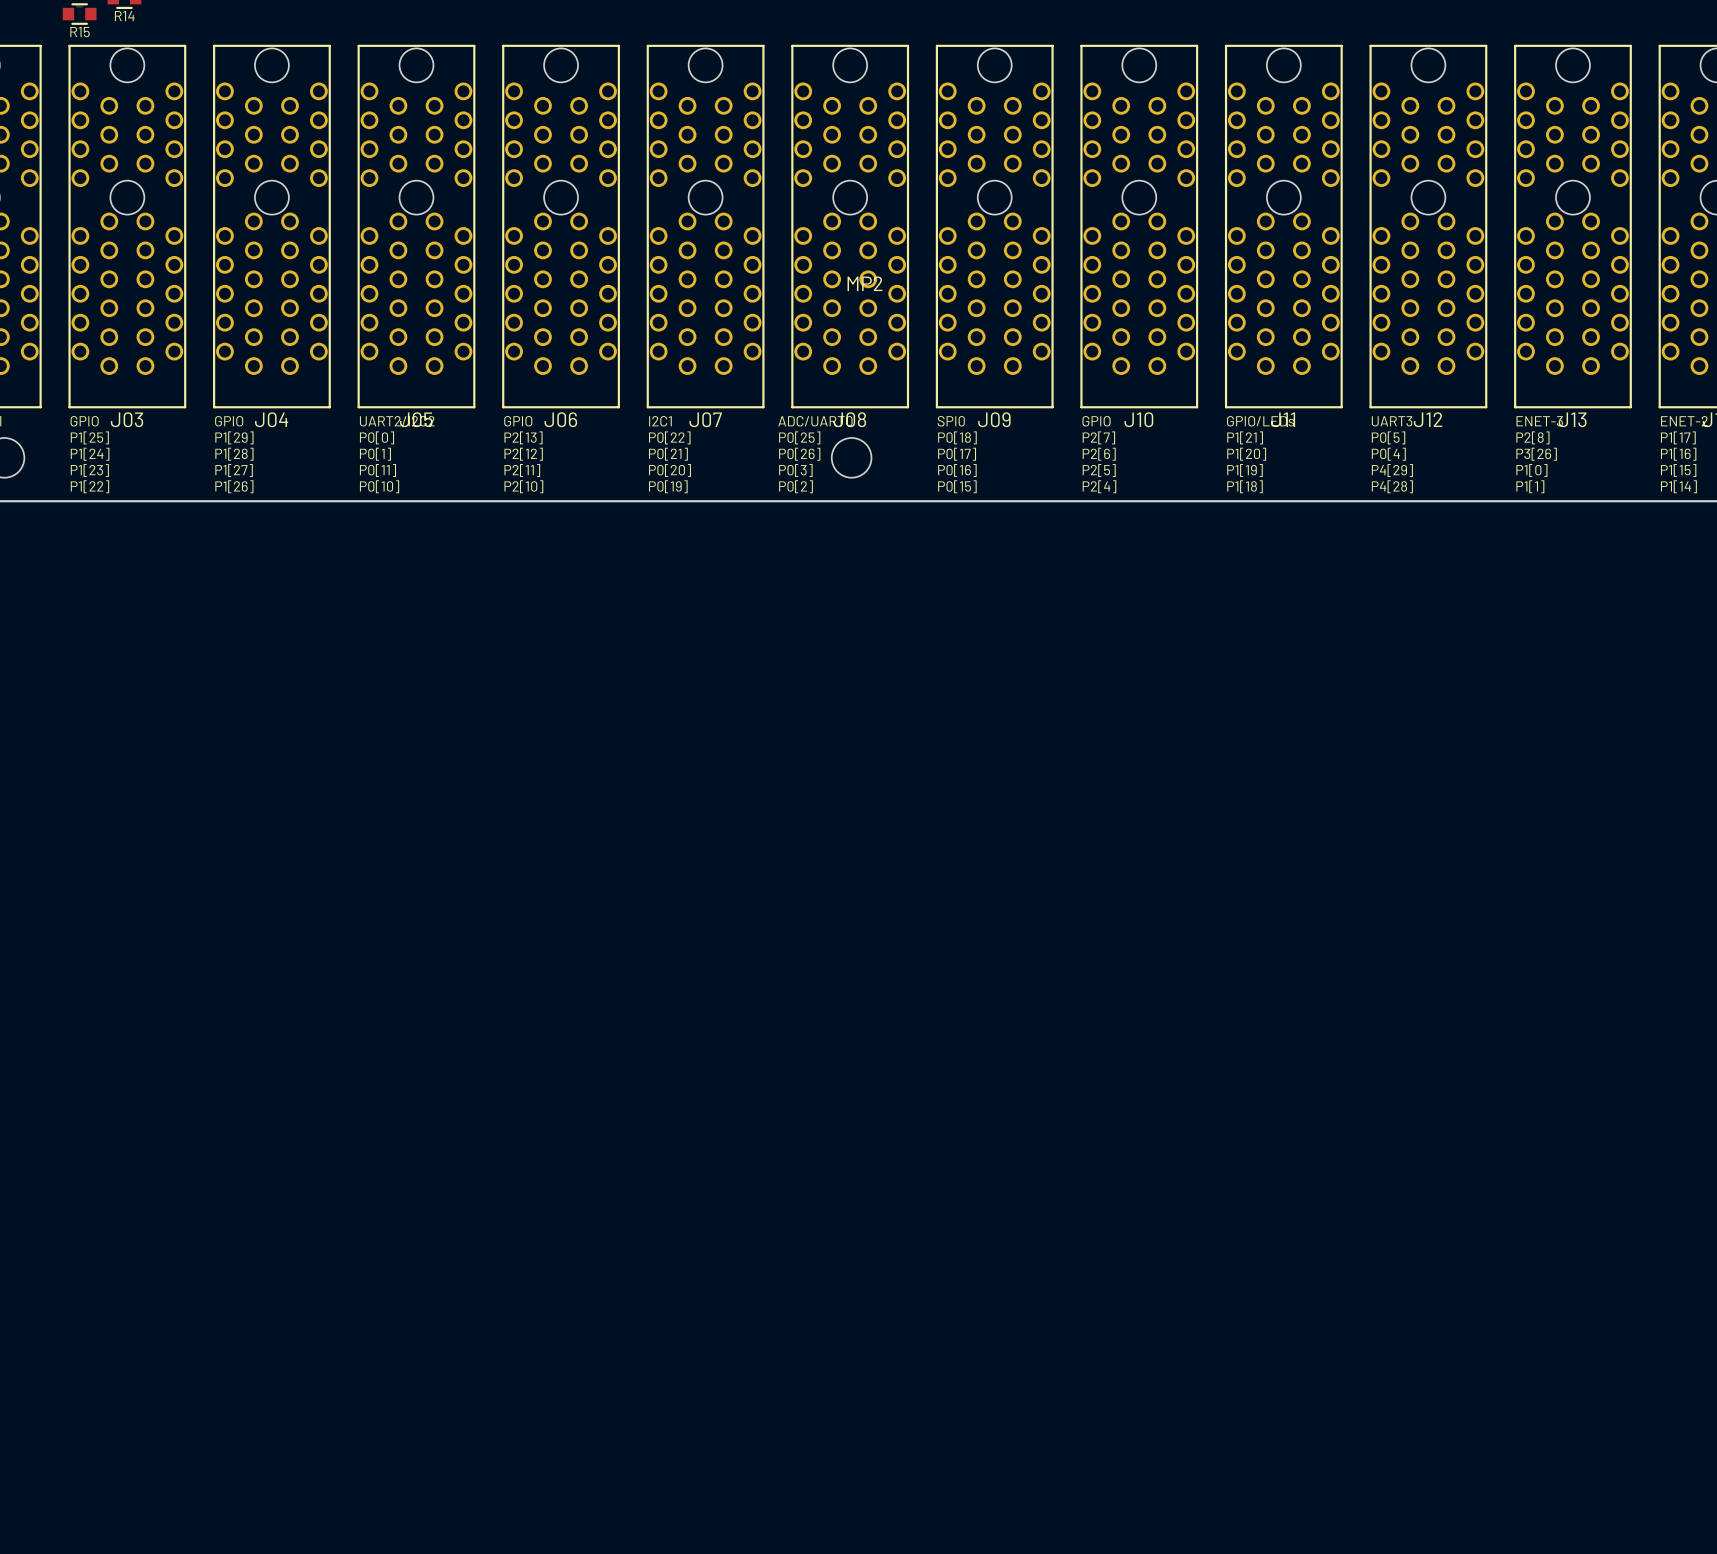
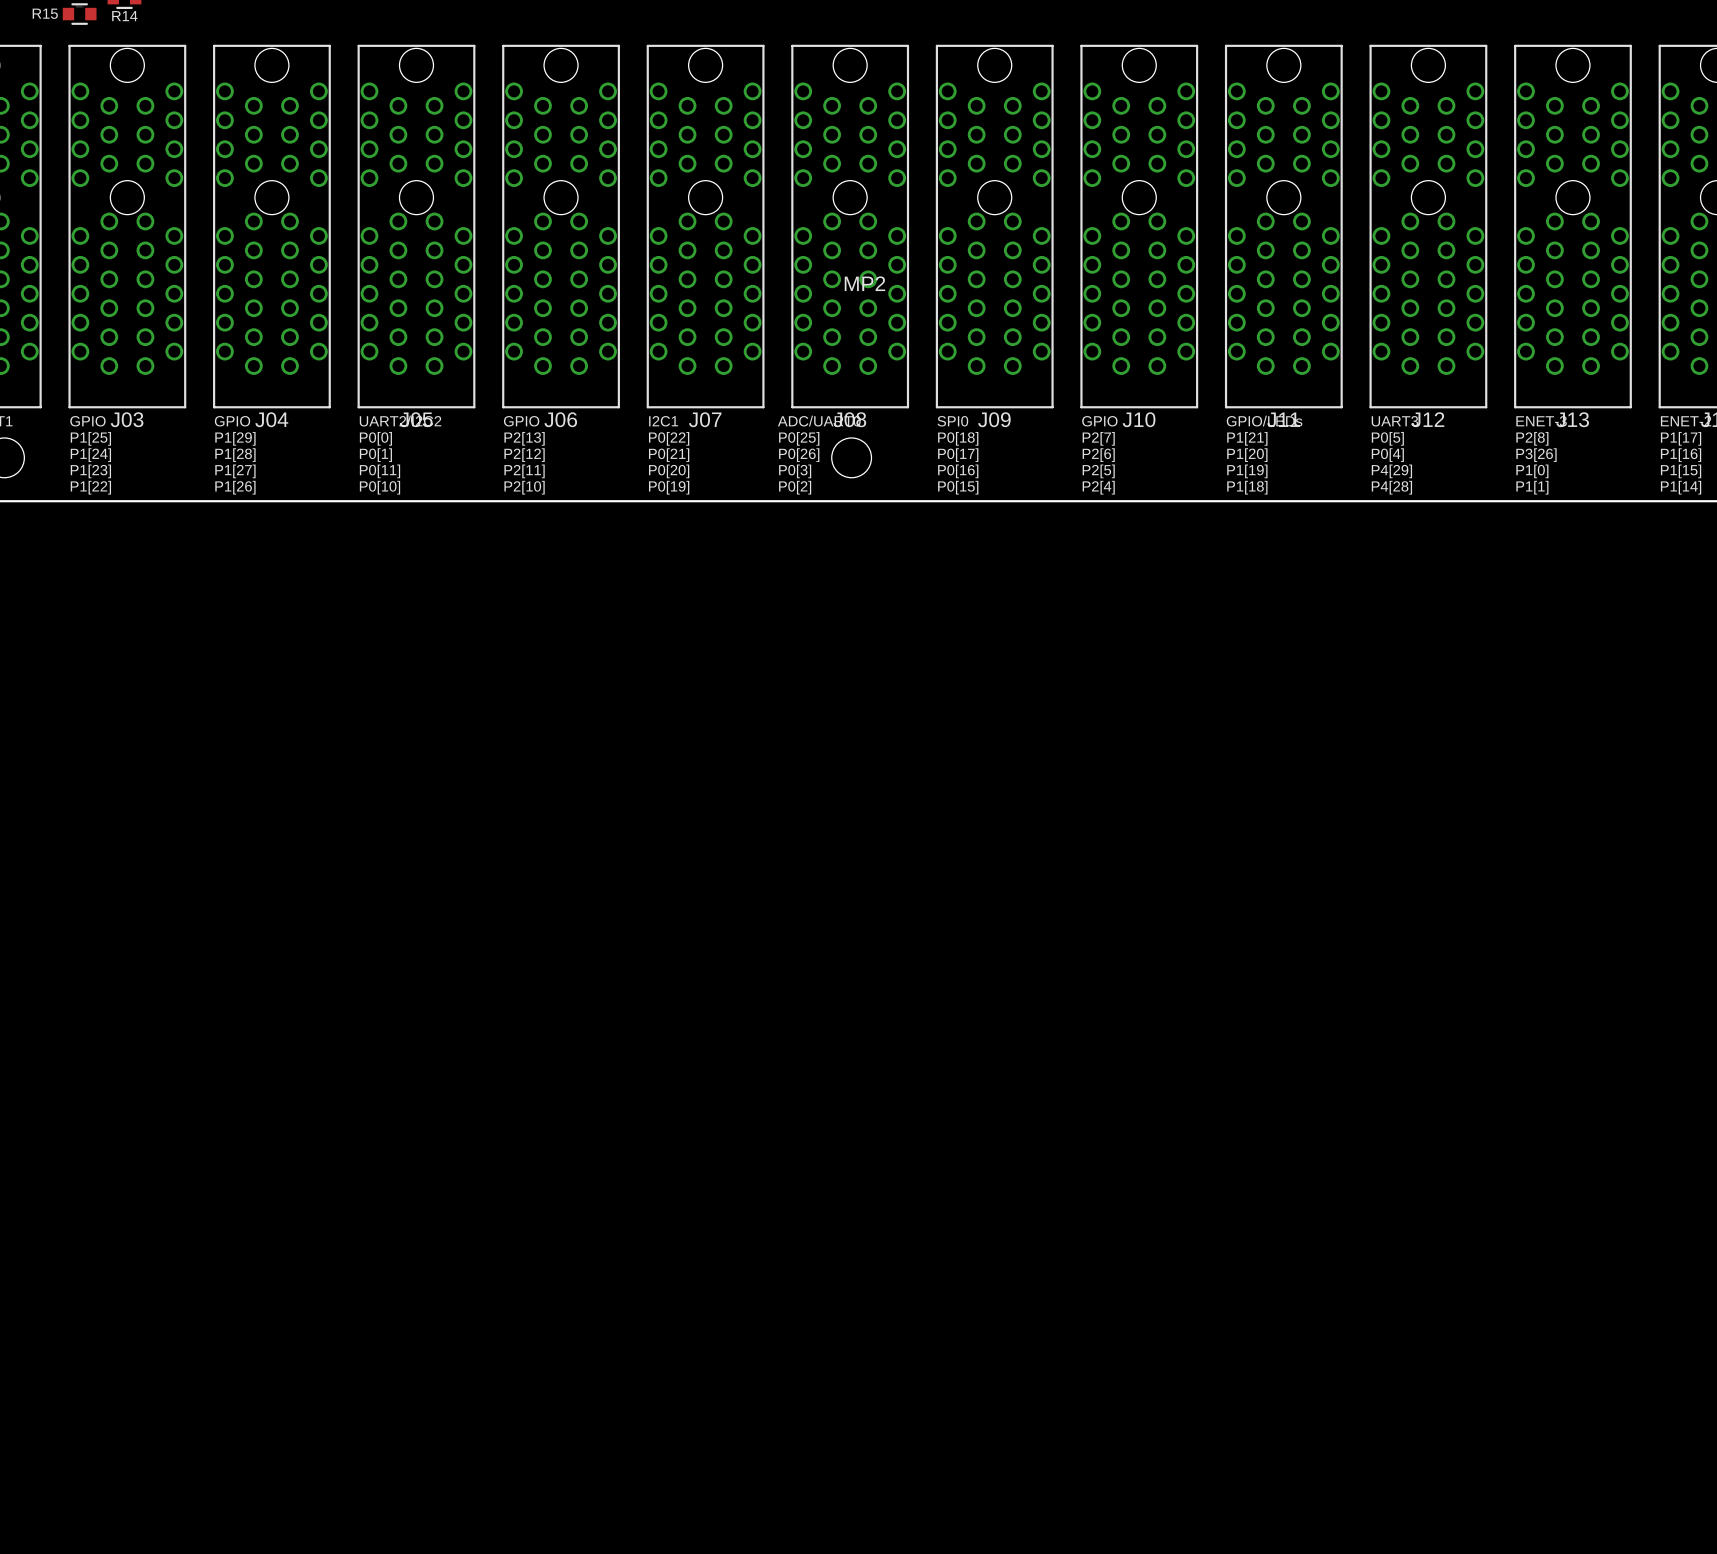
R15 name position: R15 (79, 32) -> R15 (45, 13)

